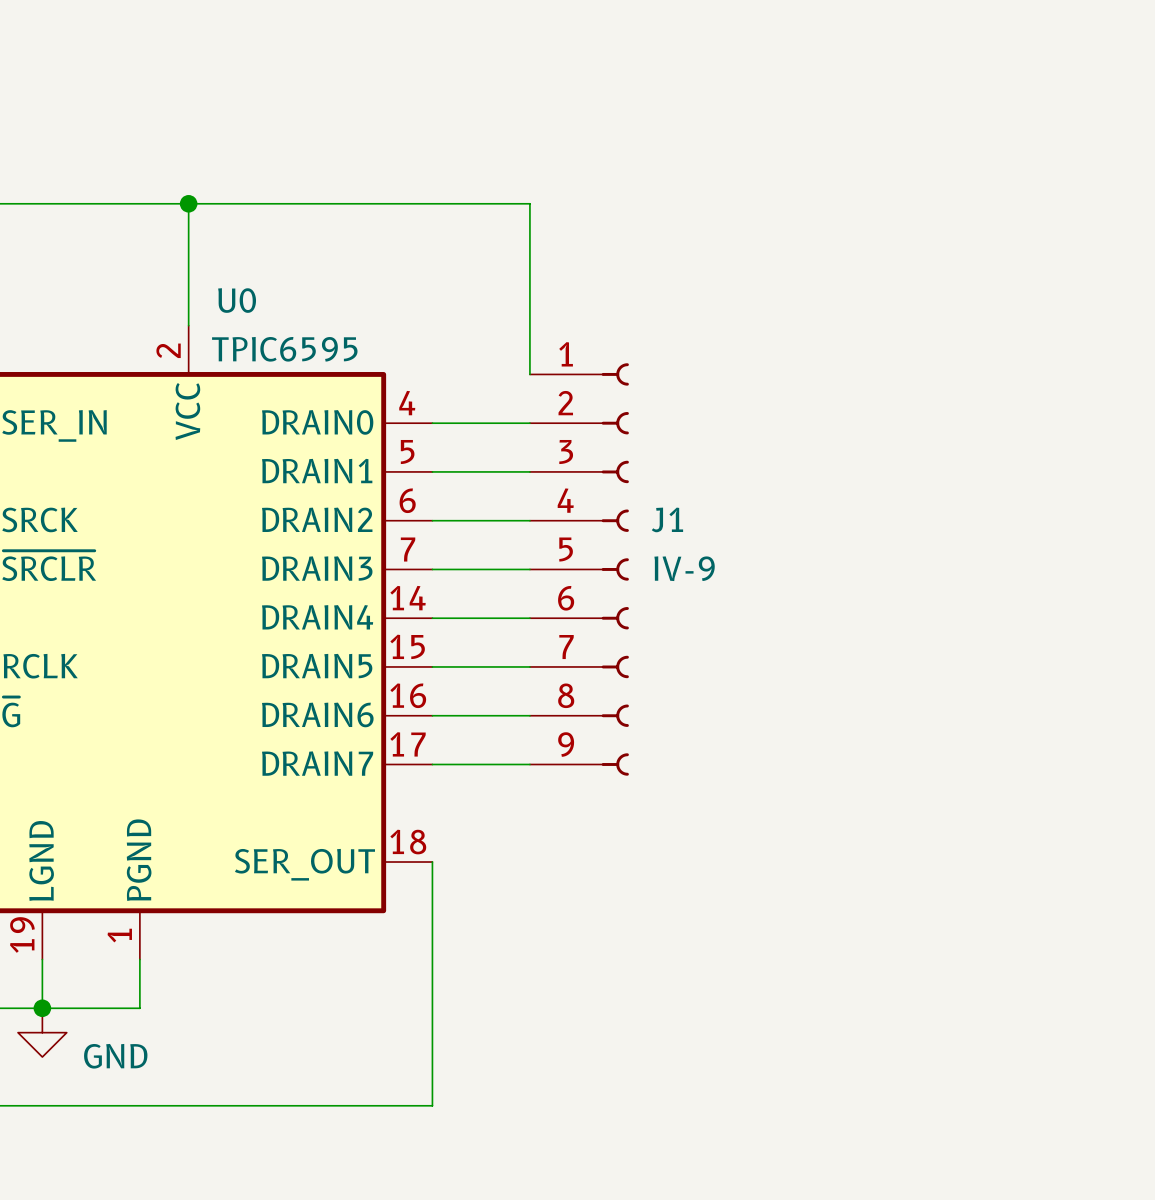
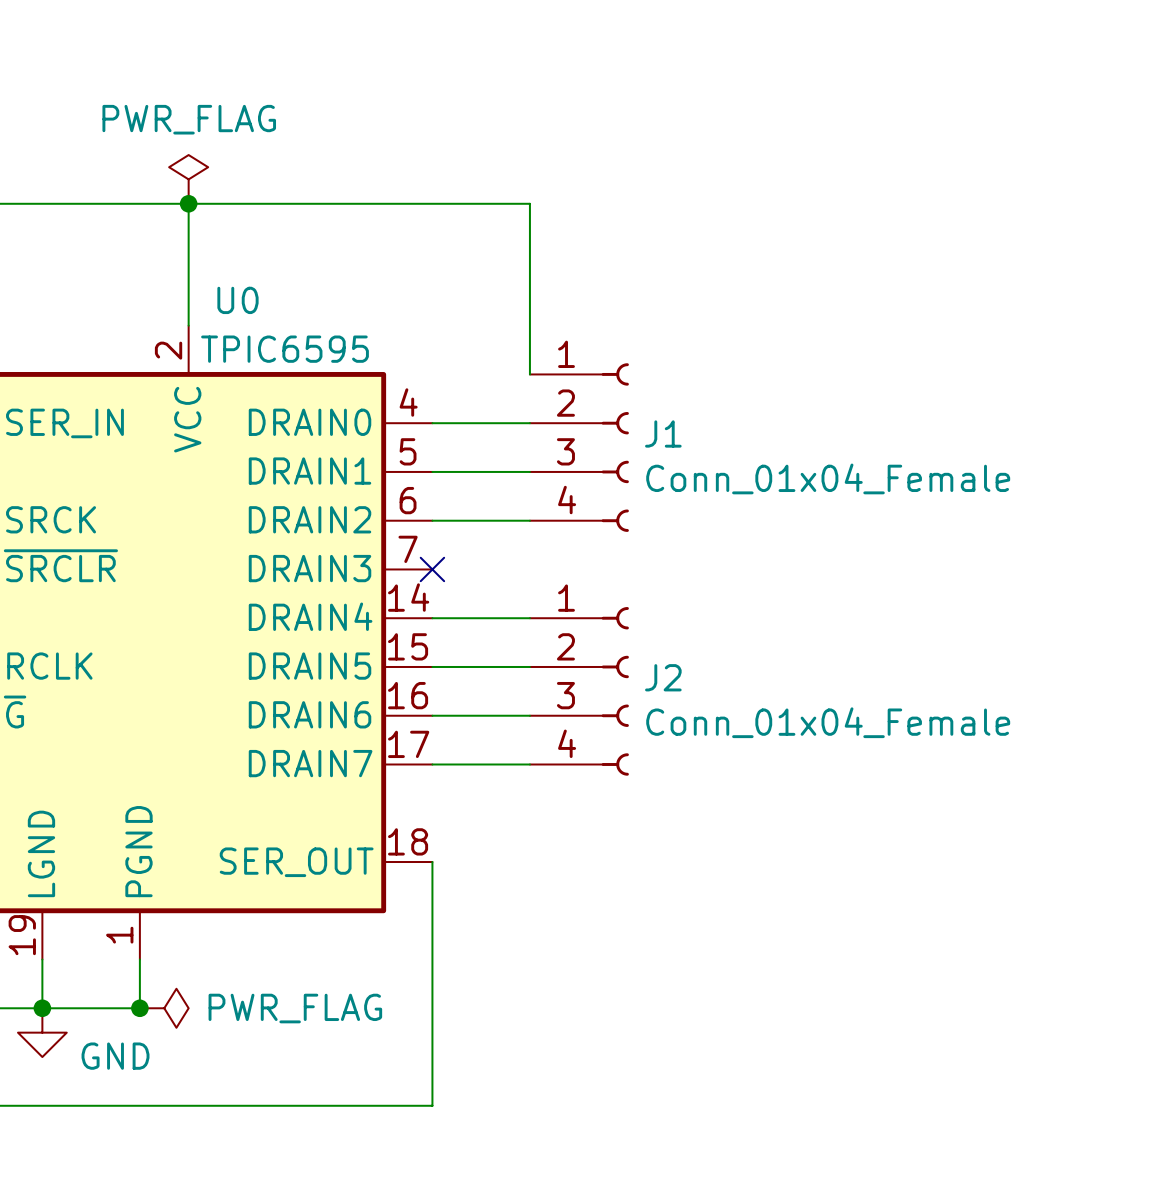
power symbol: none -> PWR_FLAG (188, 179)
J1 symbol: [529, 363, 629, 776] -> [529, 363, 629, 532]
J1 value: IV-9 (684, 568) -> Conn_01x04_Female (828, 478)
wire: (432, 569) (529, 569) -> none
no-connect mark: none -> (432, 569)
J2: none -> Conn_01x04_Female (579, 691)
junction: none -> (139, 1008)
power symbol: none -> PWR_FLAG (164, 1008)

